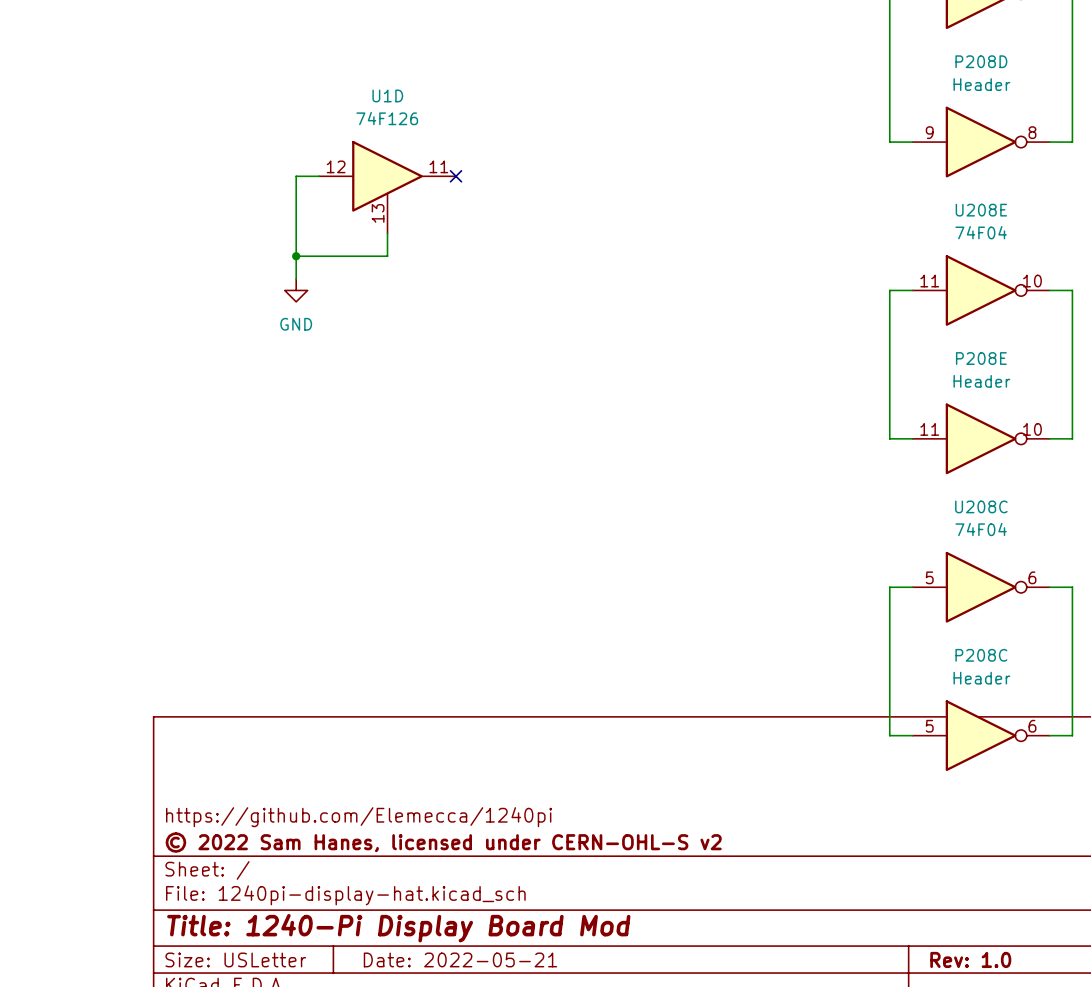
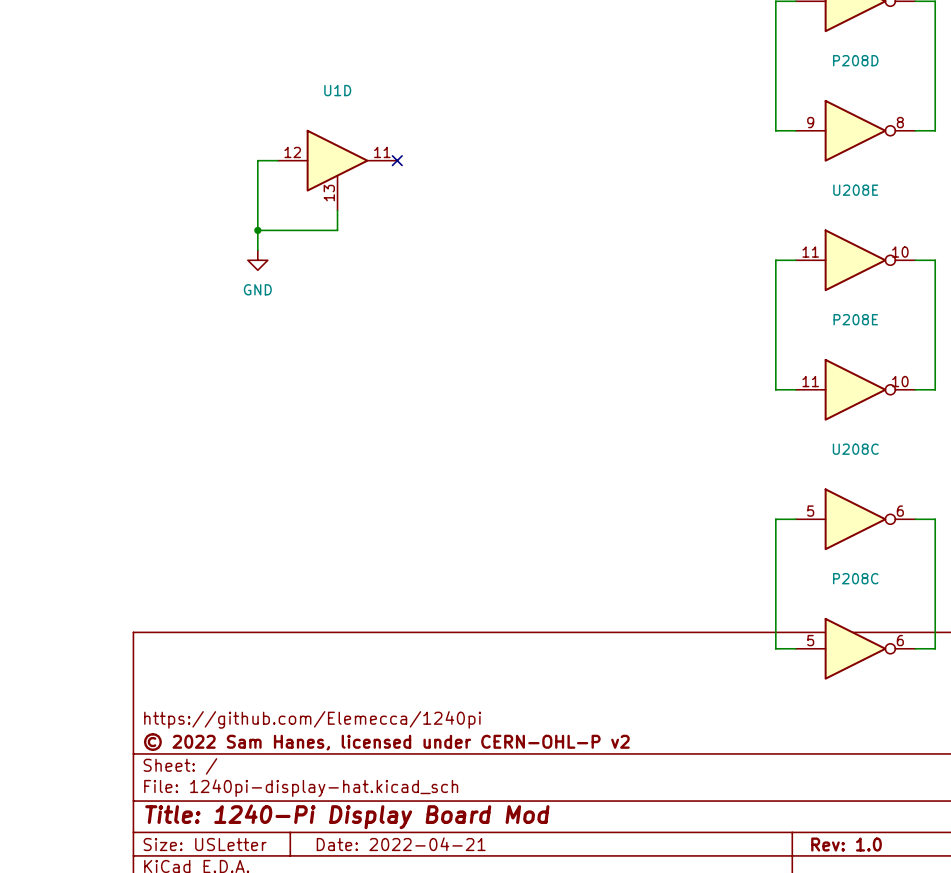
P208D value: Header (981, 84) -> none
U1D value: 74F126 (387, 118) -> none
U208E value: 74F04 (981, 232) -> none
P208E value: Header (981, 381) -> none
U208C value: 74F04 (981, 529) -> none
P208C value: Header (981, 678) -> none
title block: © 2022 Sam Hanes, licensed under CERN-OHL-S v2 (443, 842) -> © 2022 Sam Hanes, licensed under CERN-OHL-P v2 (386, 742)
title block: Date: 2022-05-21 (460, 959) -> Date: 2022-04-21 (401, 844)

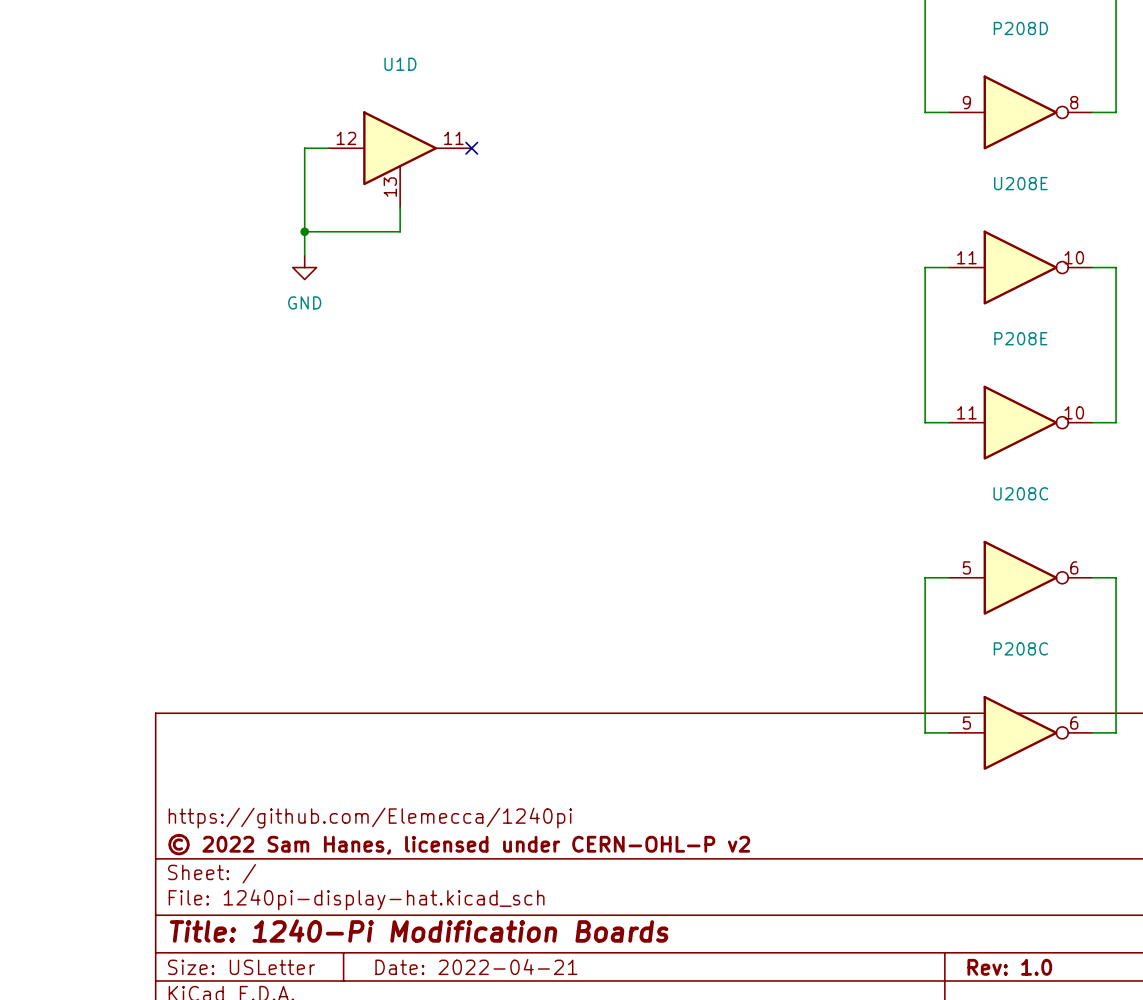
title block: Title: 1240-Pi Display Board Mod (347, 816) -> Title: 1240-Pi Modification Boards (419, 930)

